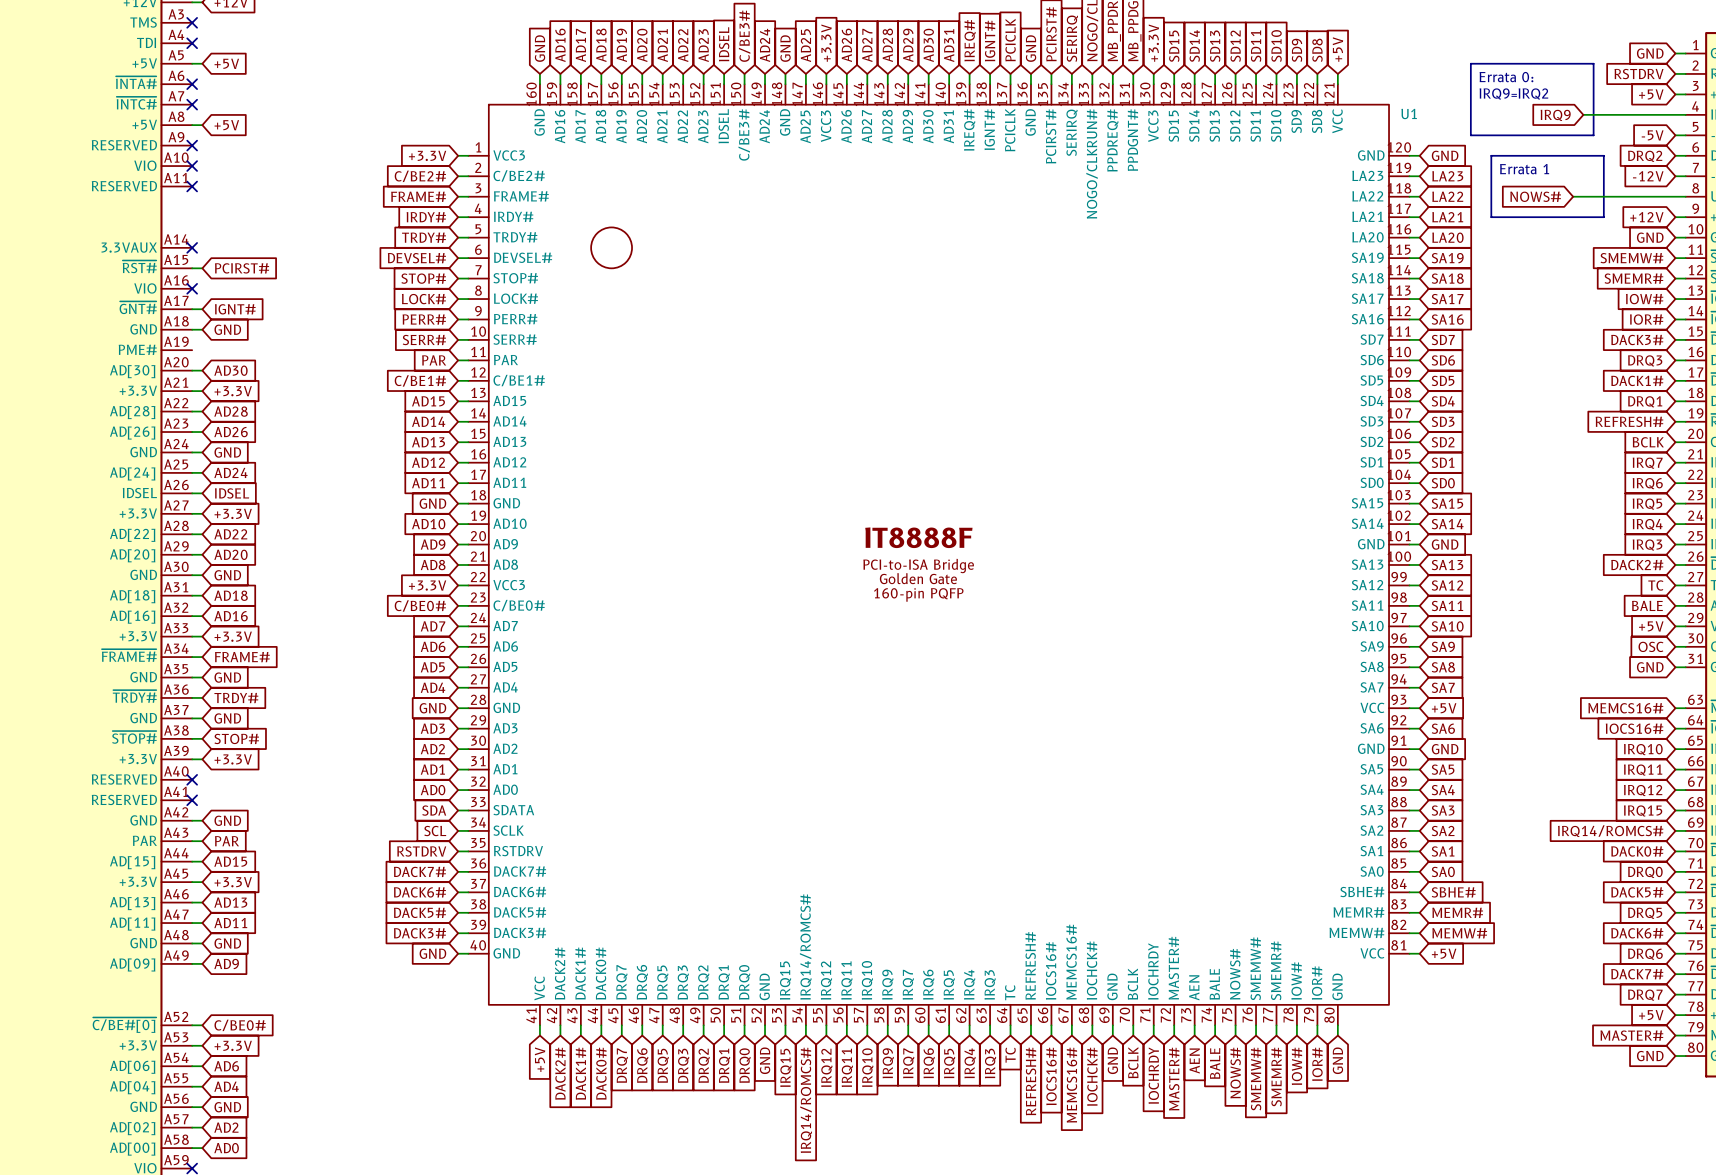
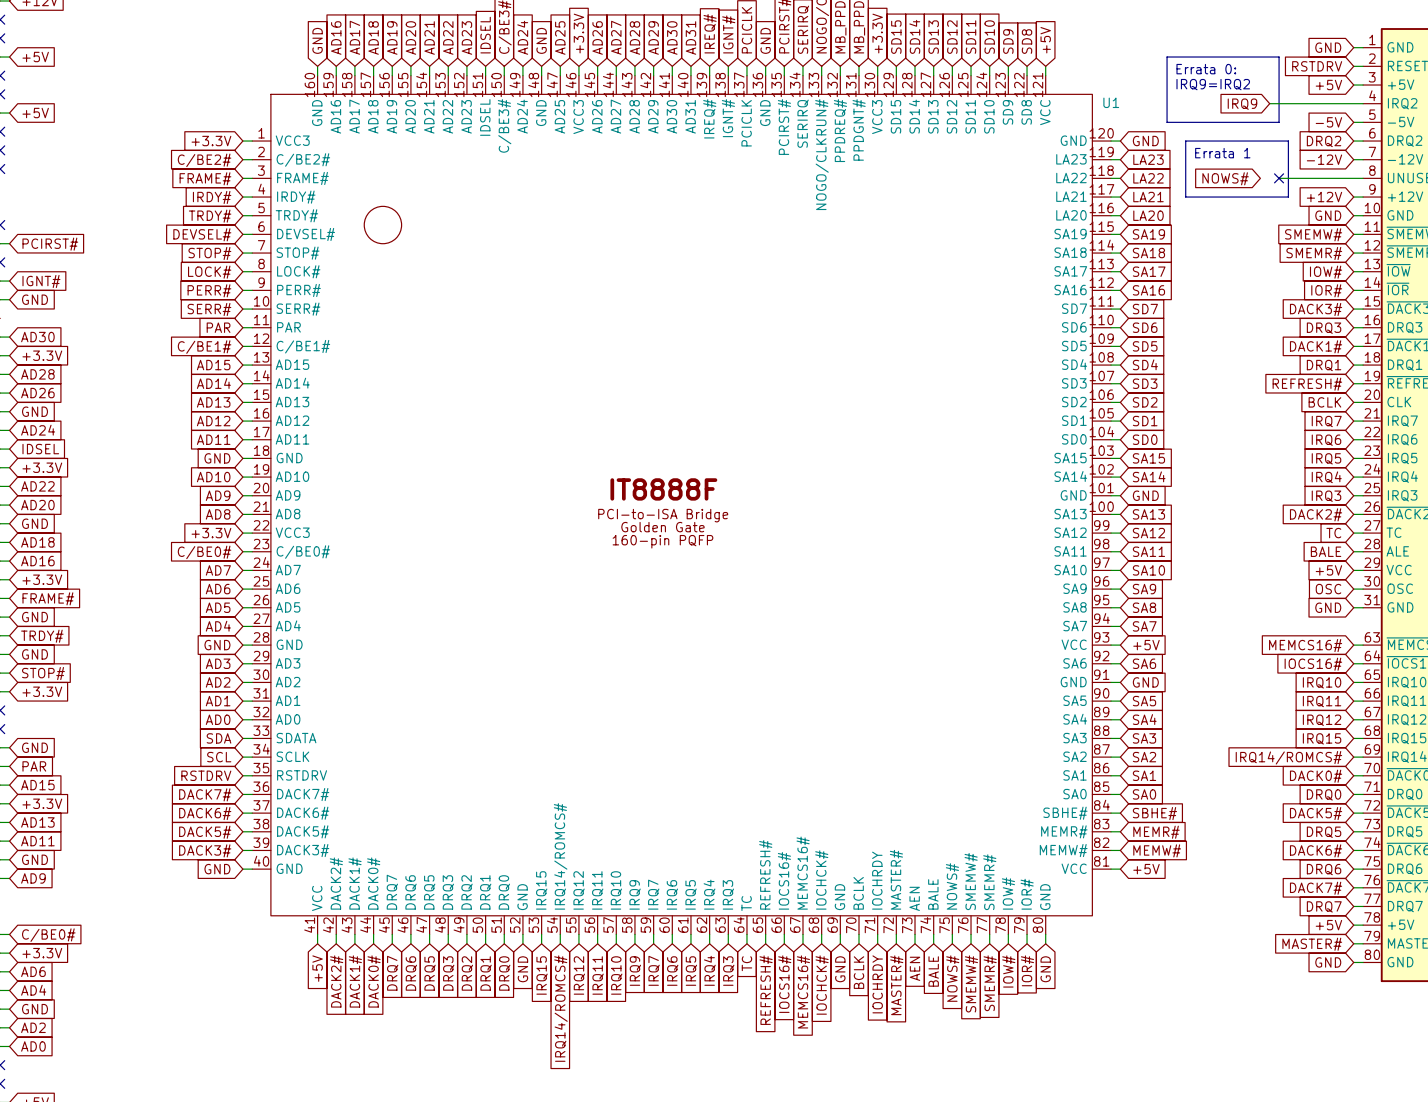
wire: (1573, 196) (1593, 196) -> none
no-connect mark: none -> (1279, 178)

